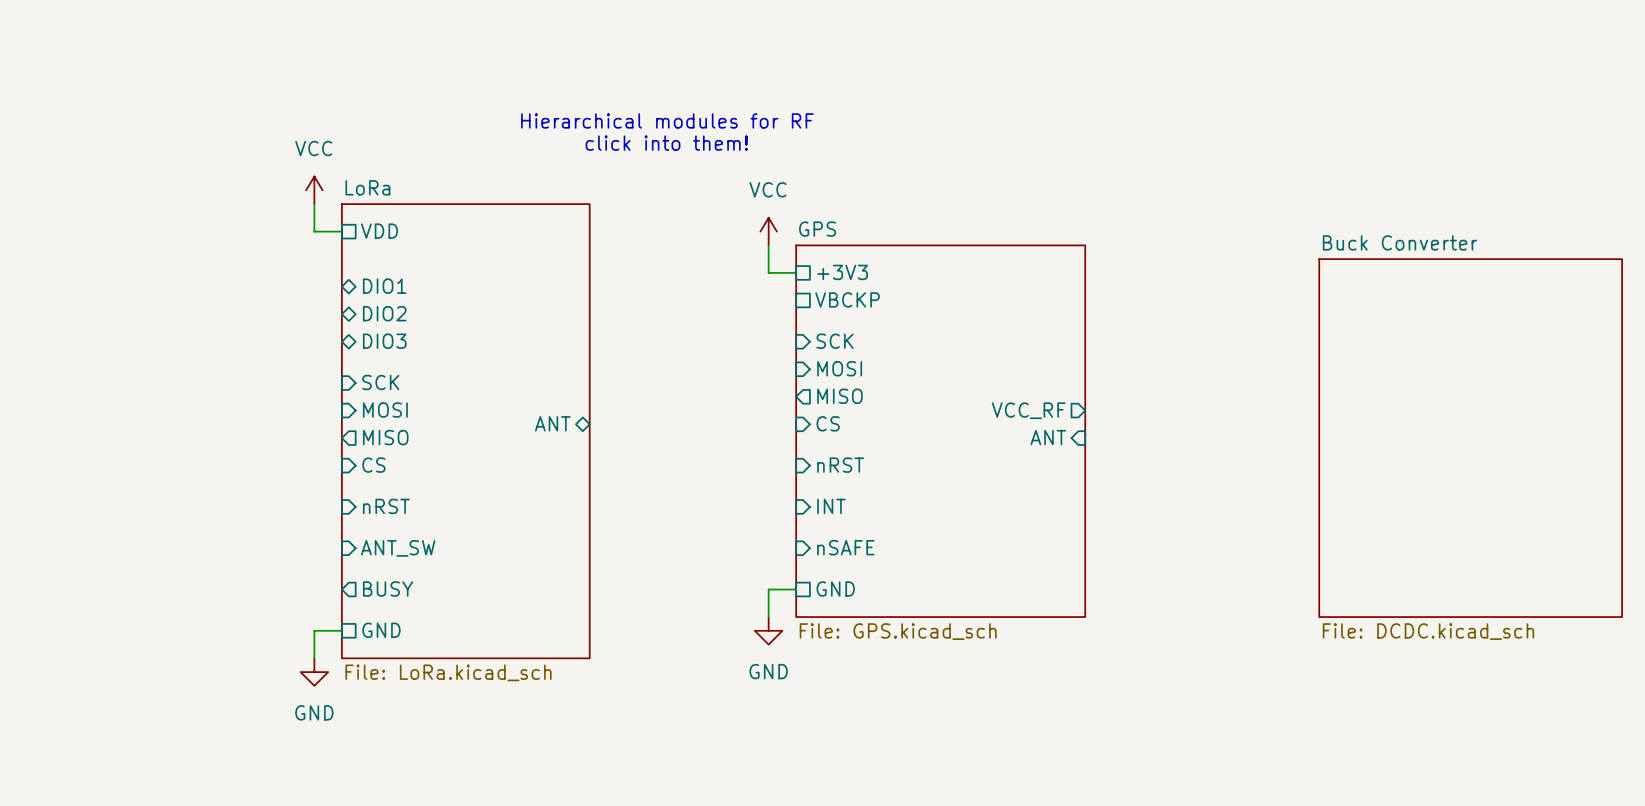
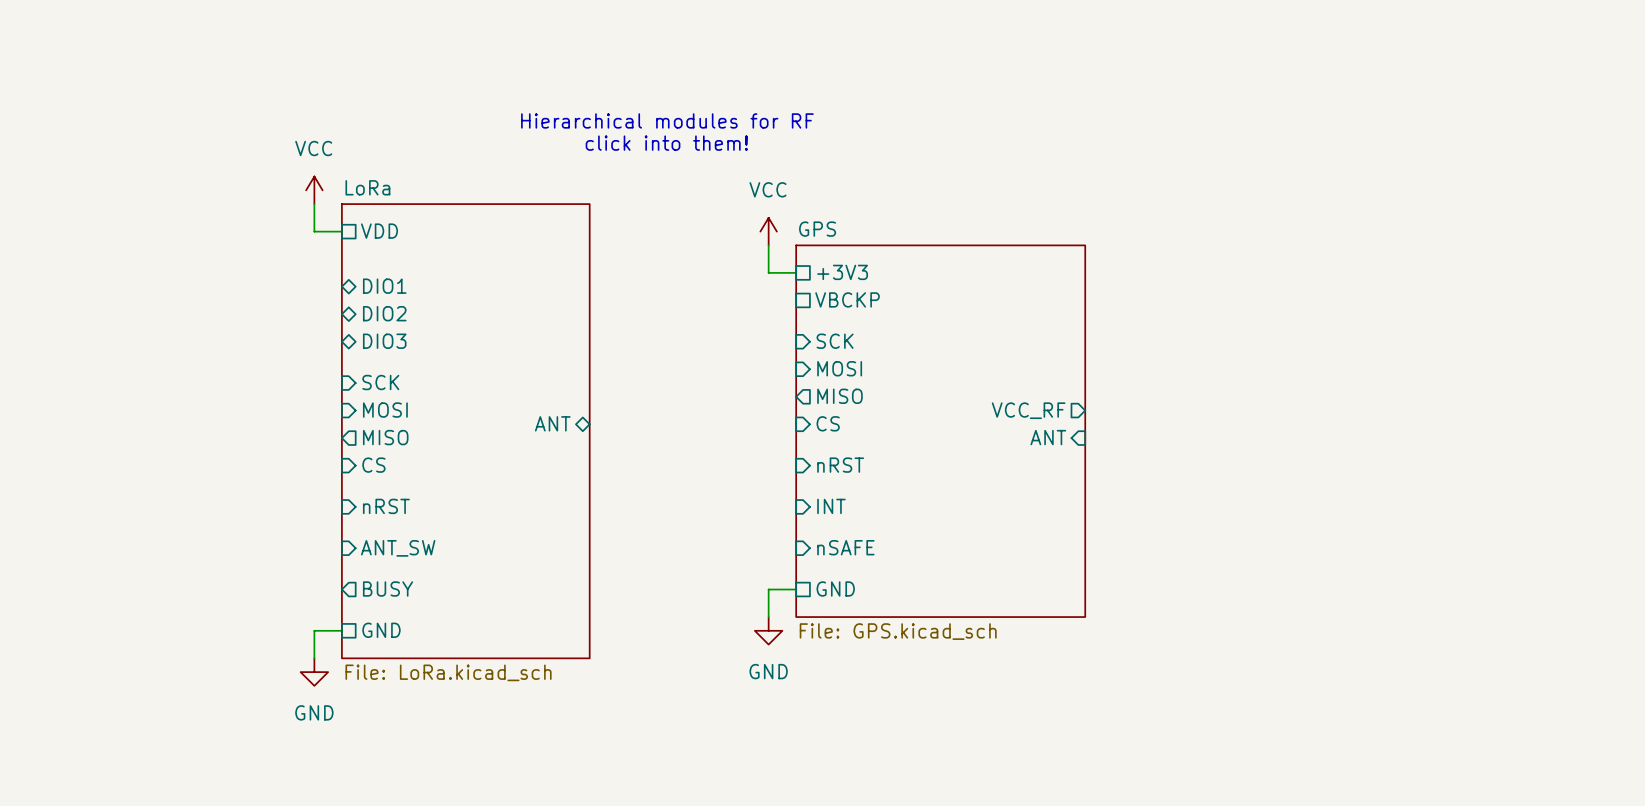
sheet Buck Converter: File: DCDC.kicad_sch (1470, 438) -> none

